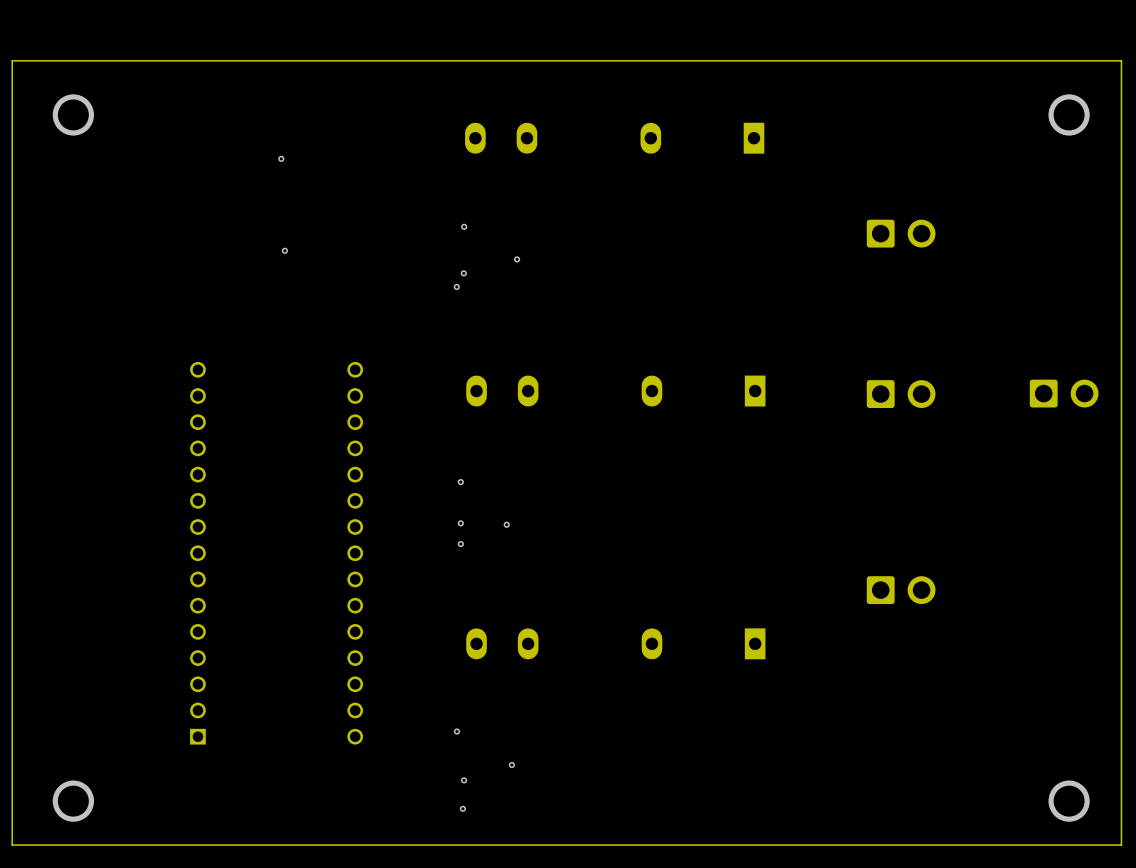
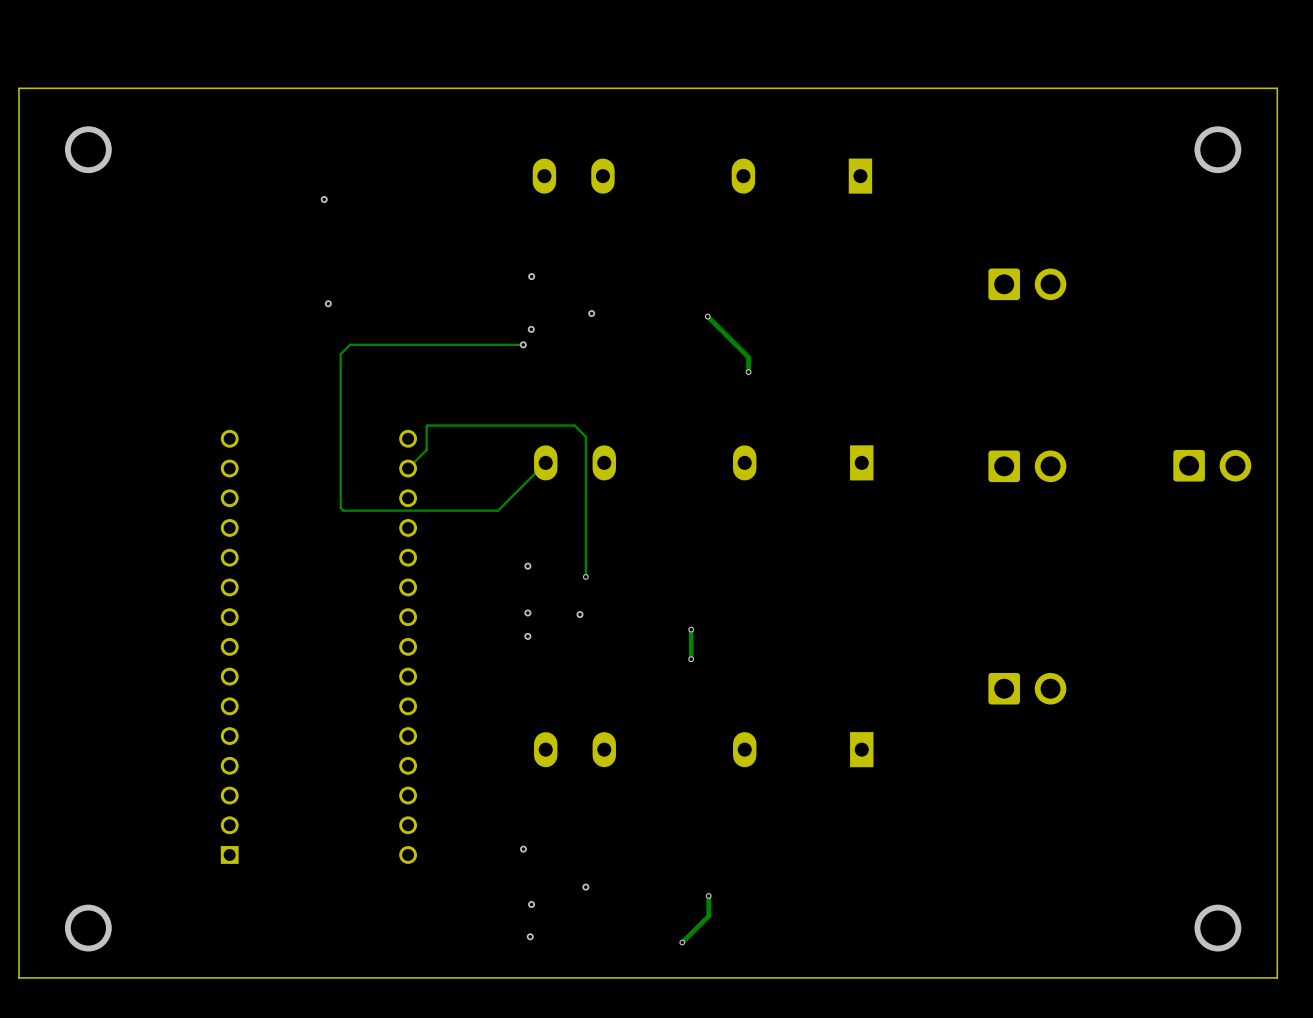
track: none -> (707, 316) (748, 357) (748, 372)
via: none -> (707, 316)
track: none -> (523, 344) (350, 344) (340, 354) (340, 507) (343, 510) (497, 510) (545, 462)
via: none -> (748, 372)
track: none -> (408, 468) (426, 449) (427, 425) (574, 425) (585, 436) (585, 576)
via: none -> (585, 576)
track: none -> (691, 629) (691, 659)
via: none -> (691, 629)
via: none -> (691, 659)
track: none -> (708, 895) (708, 916) (682, 942)
via: none -> (708, 895)
via: none -> (682, 942)

